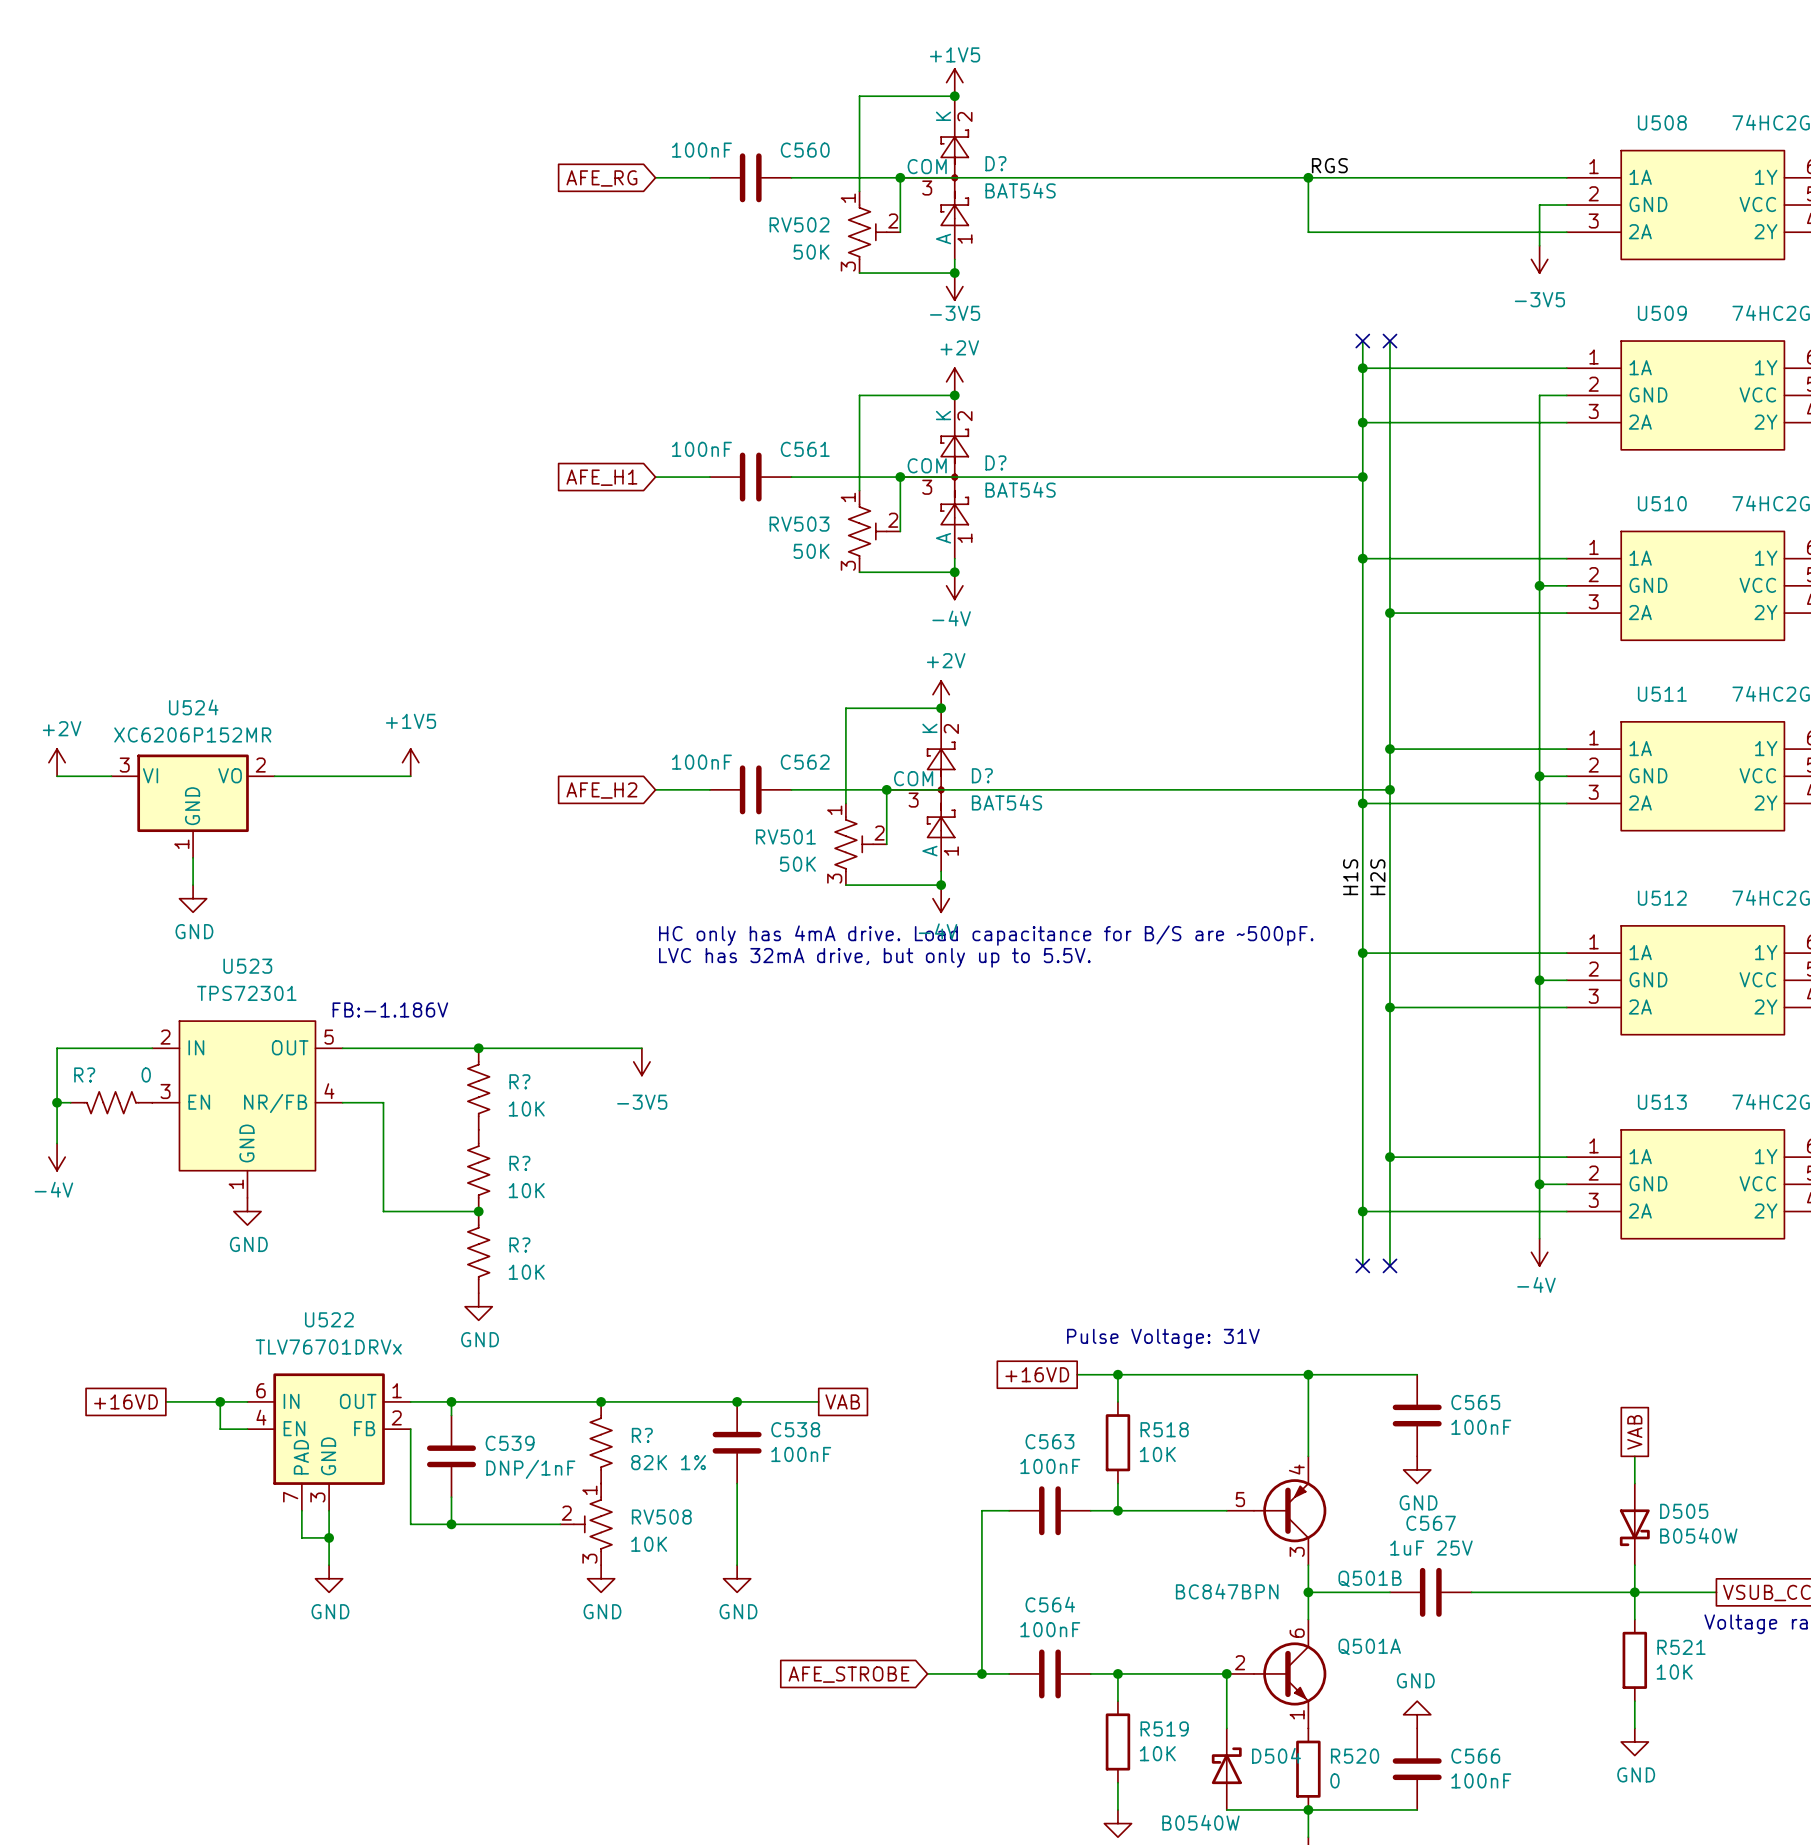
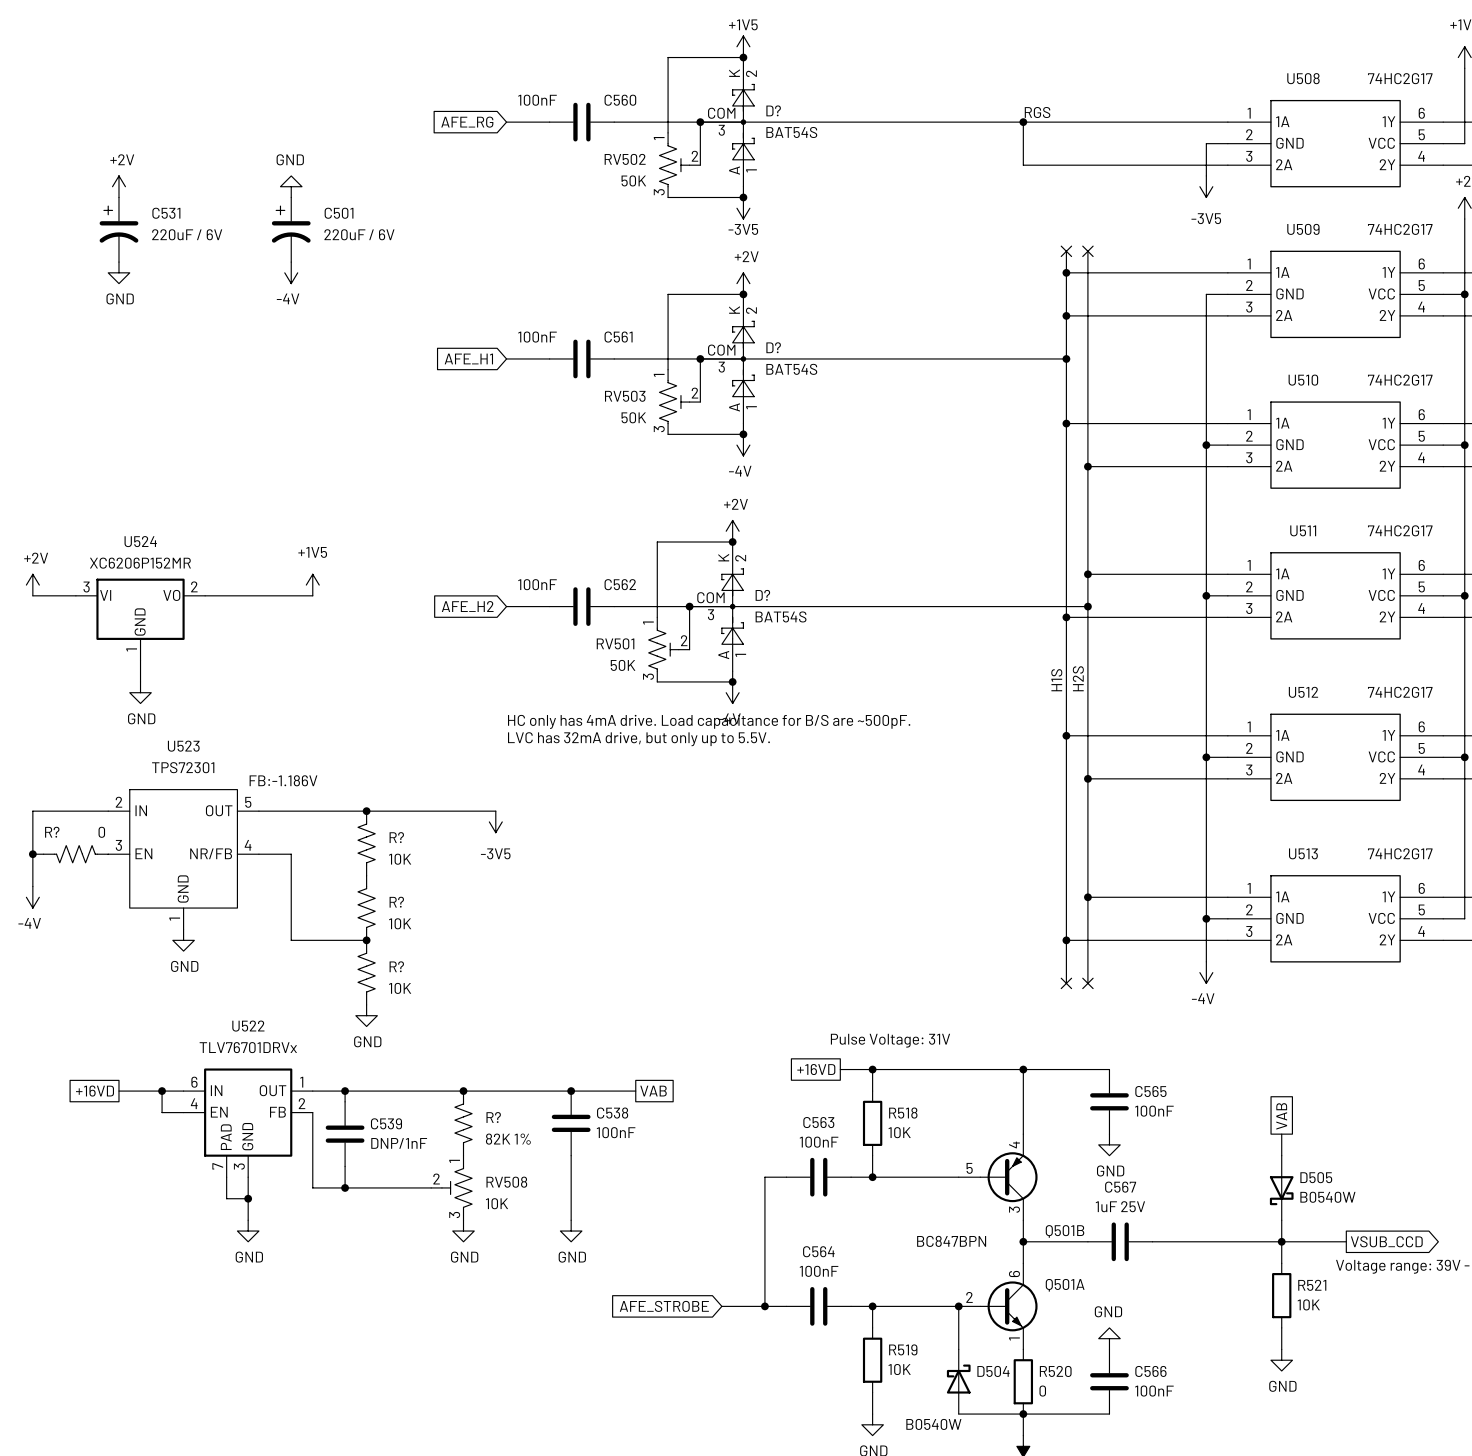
power symbol: none -> +2V (118, 186)
power symbol: none -> GND (291, 186)
C531: none -> 220uF / 6V (118, 229)
C501: none -> 220uF / 6V (291, 229)
power symbol: none -> GND (118, 272)
power symbol: none -> -4V (291, 272)

